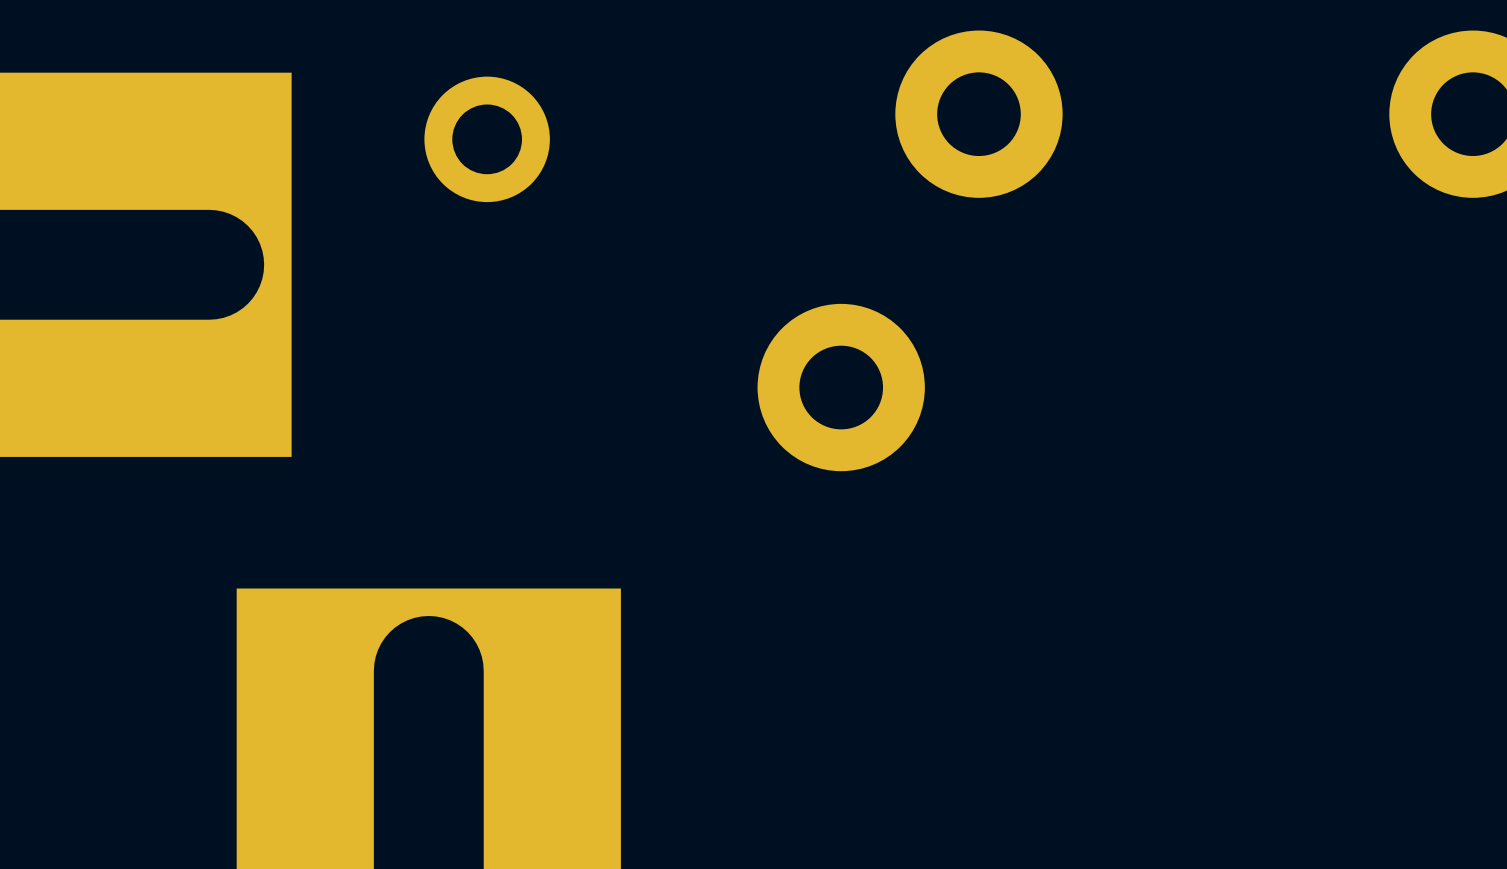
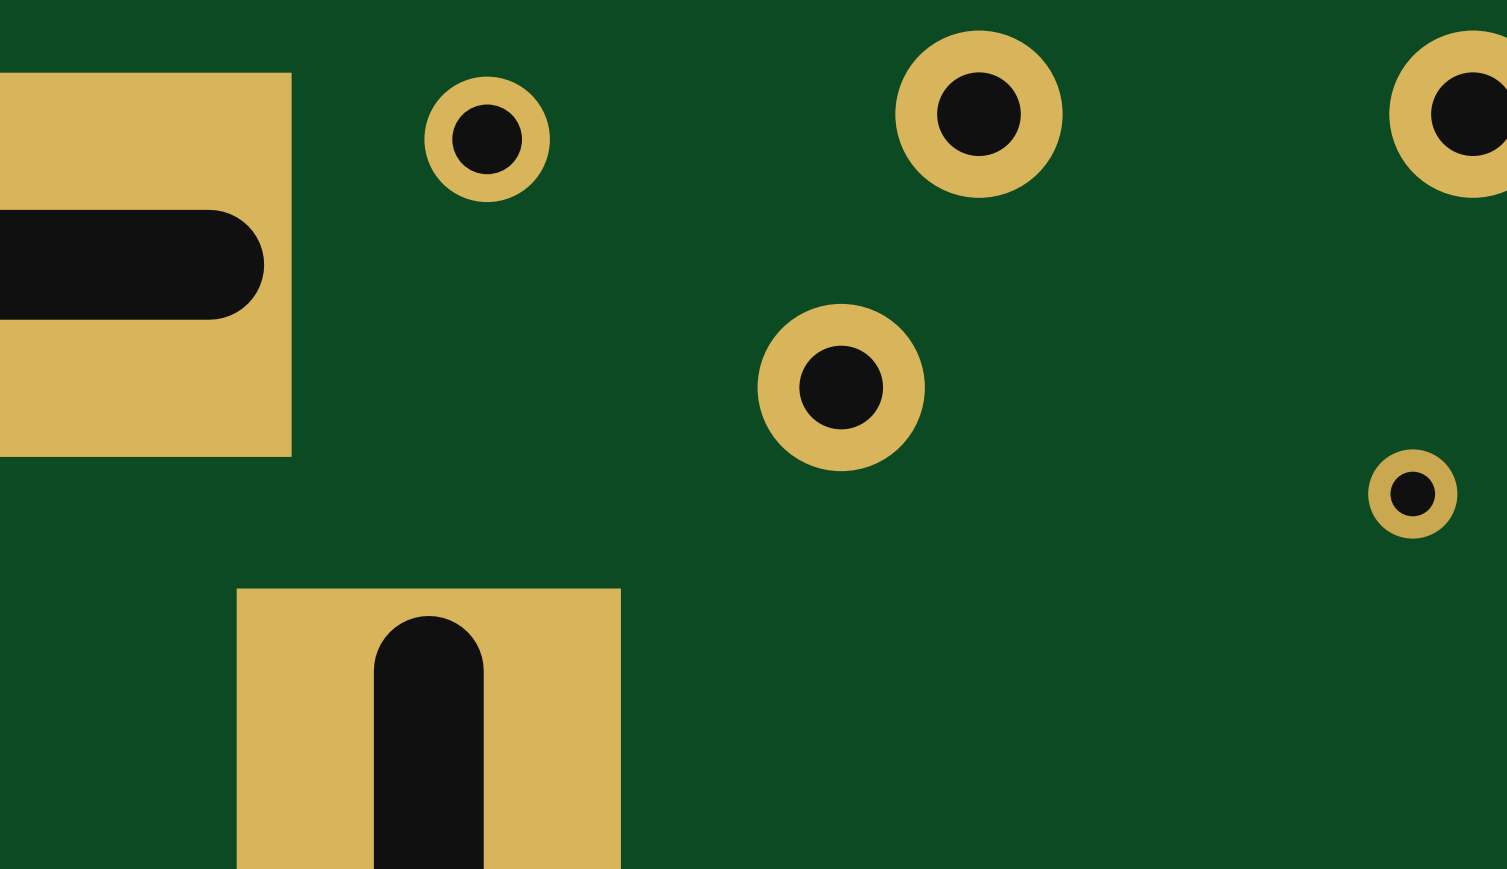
via: none -> (1412, 494)

